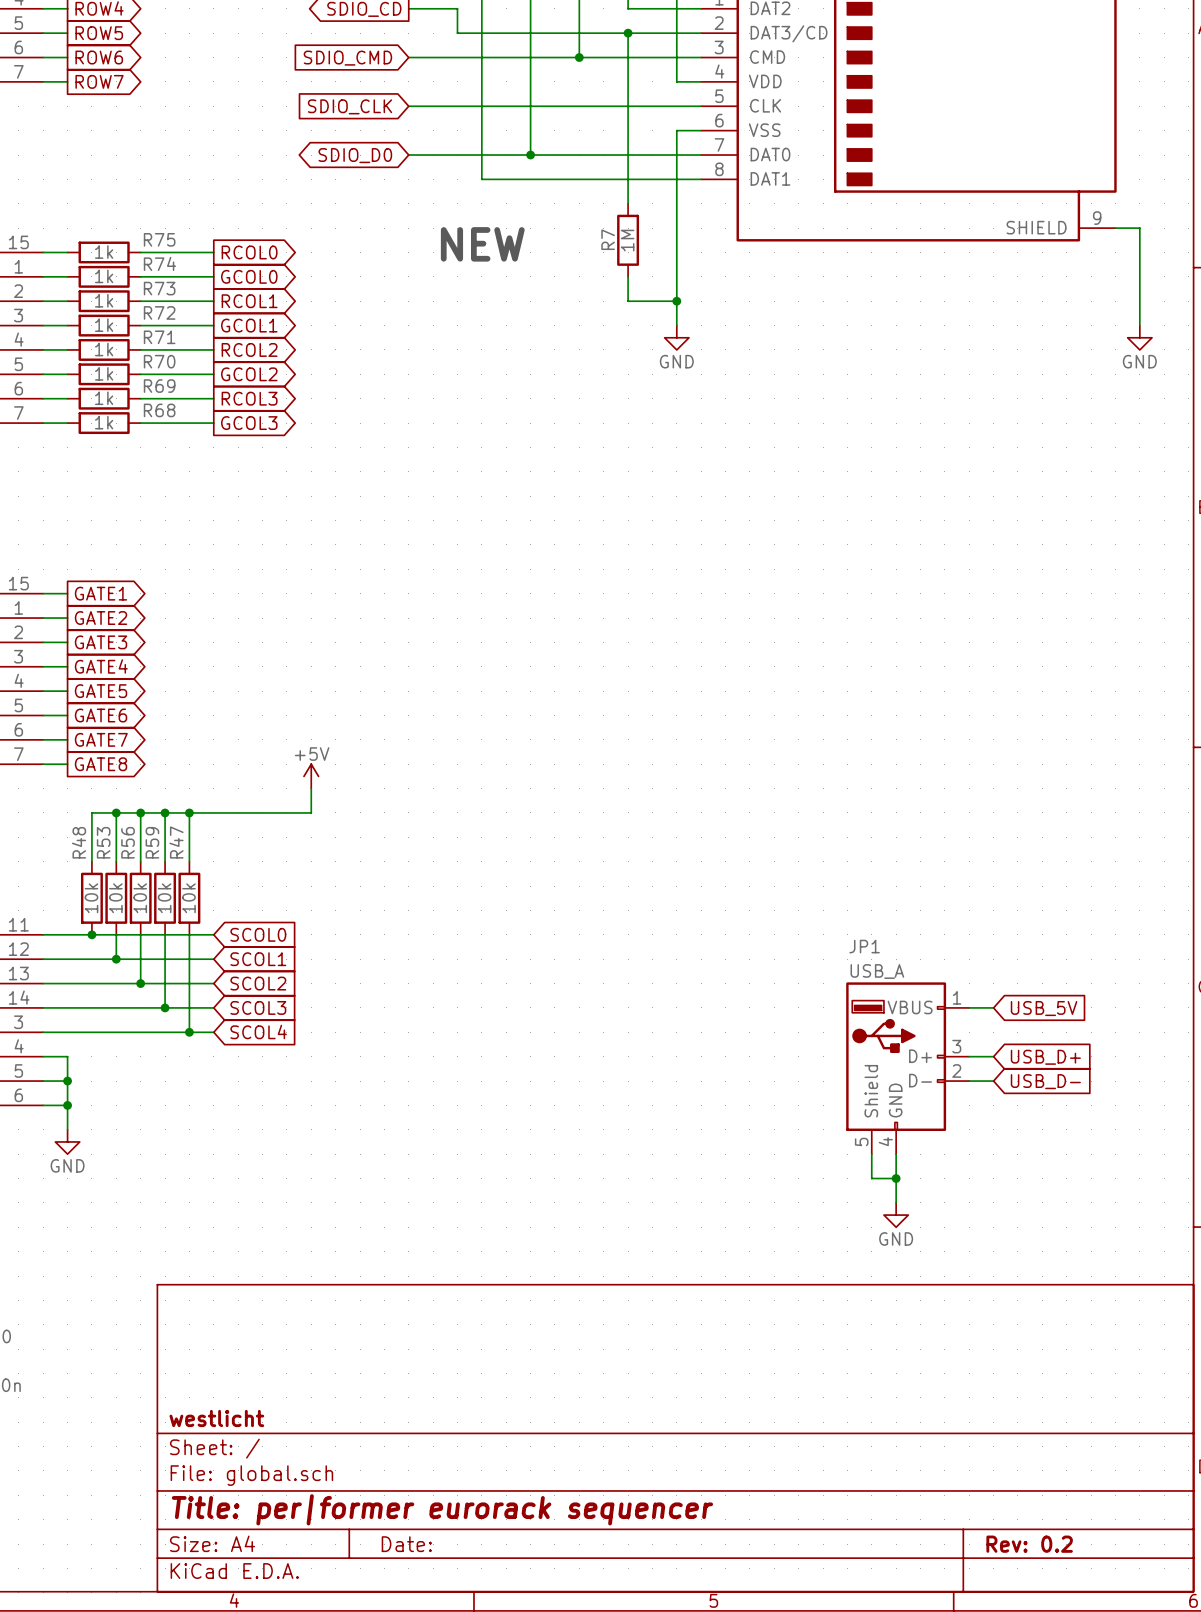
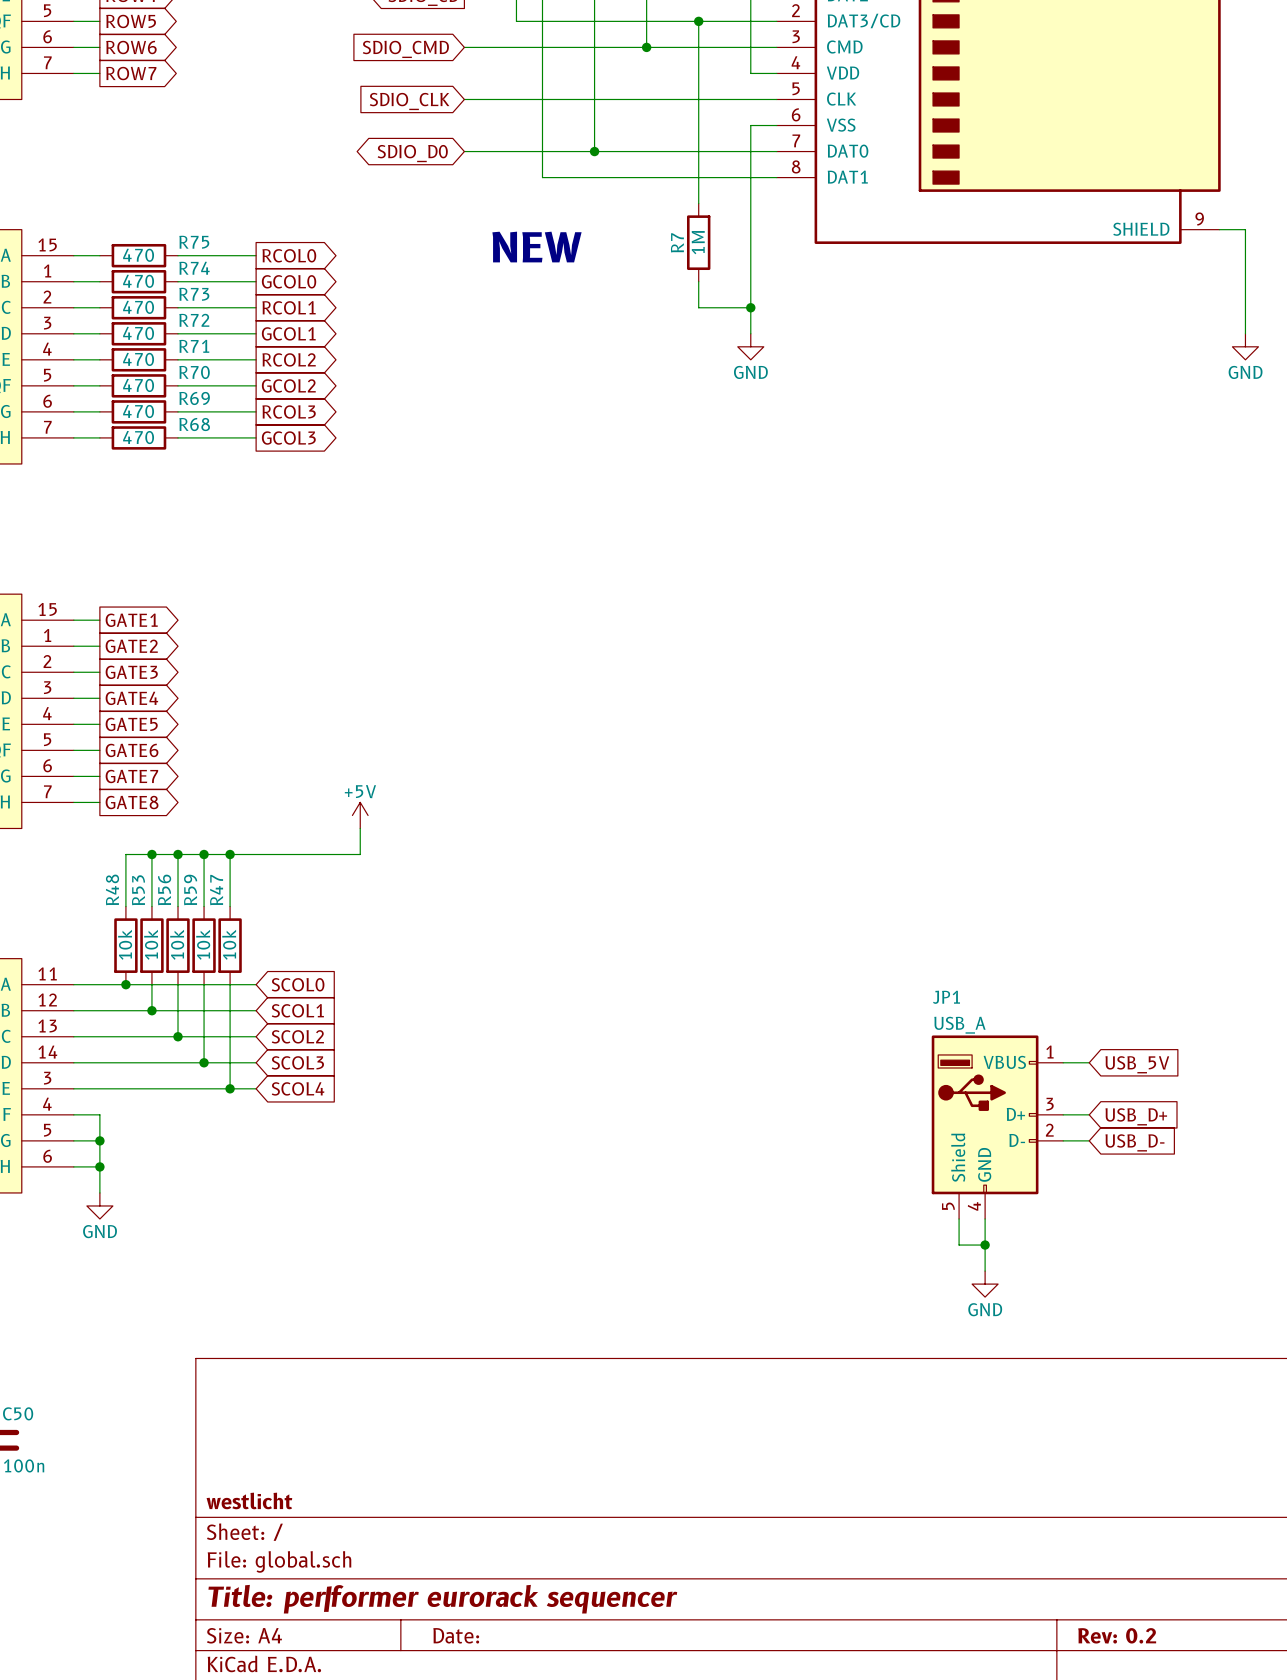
R75 value: 1k (104, 252) -> 470 (138, 255)
R74 value: 1k (104, 276) -> 470 (138, 281)
R73 value: 1k (104, 300) -> 470 (138, 307)
R72 value: 1k (104, 325) -> 470 (138, 333)
R71 value: 1k (104, 349) -> 470 (138, 359)
R70 value: 1k (104, 373) -> 470 (138, 385)
R69 value: 1k (104, 398) -> 470 (138, 411)
R68 value: 1k (104, 422) -> 470 (138, 437)

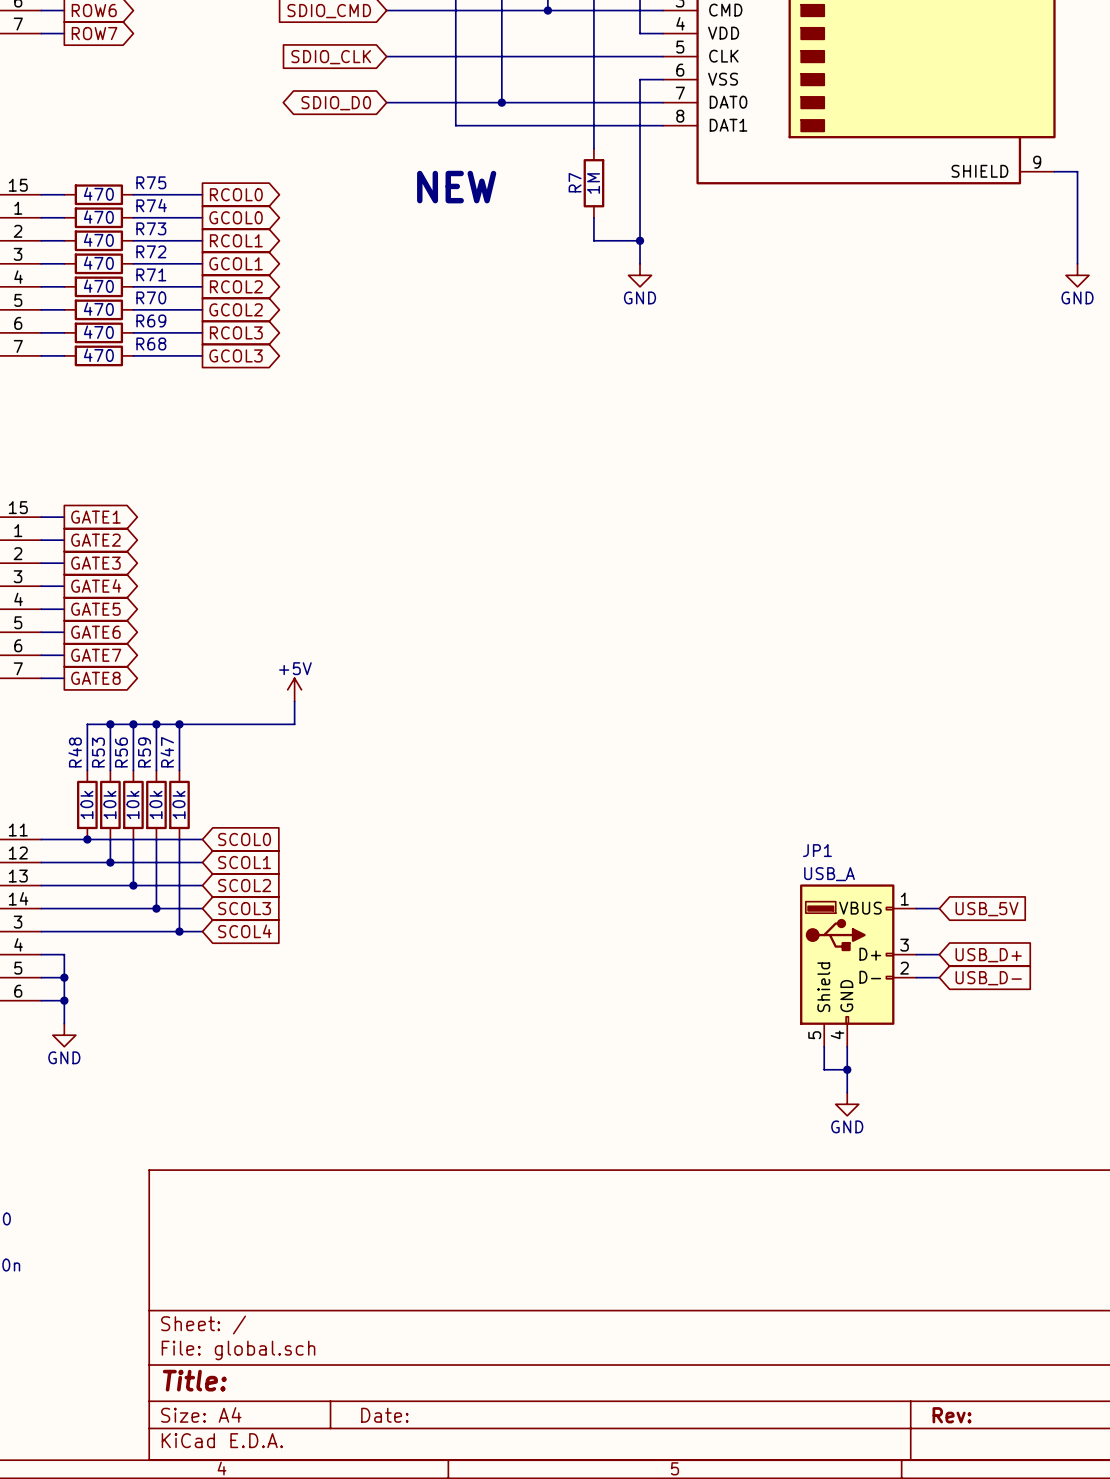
title block: westlicht (249, 1500) -> none
title block: Title: per|former eurorack sequencer (442, 1599) -> Title: (194, 1380)
title block: Rev: 0.2 (1117, 1635) -> Rev: (952, 1415)

